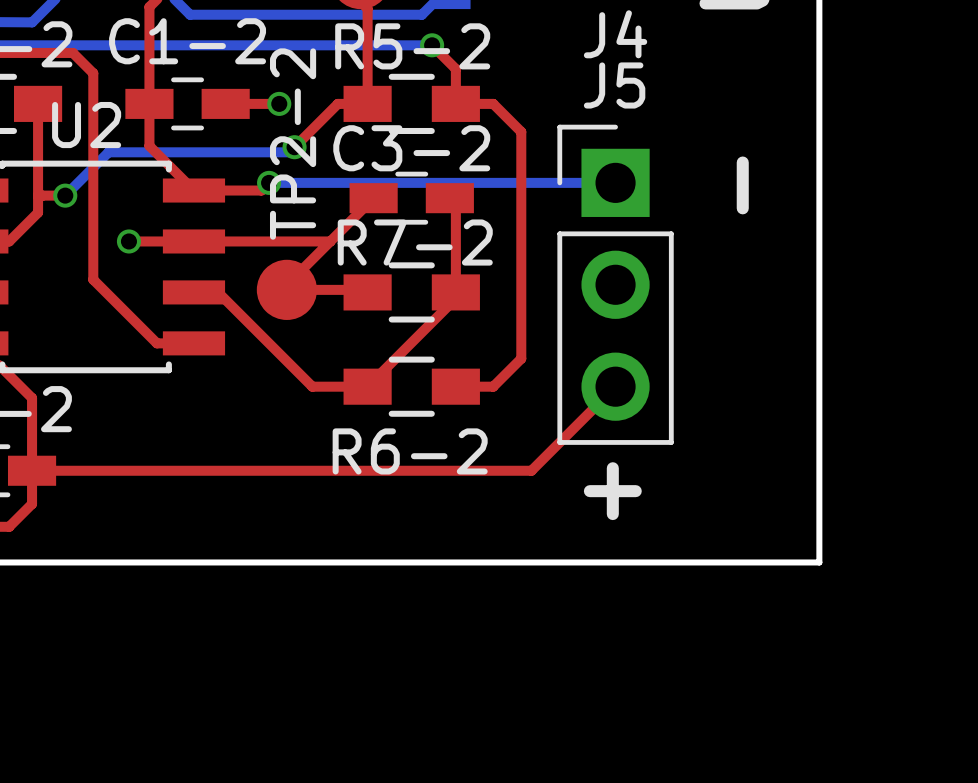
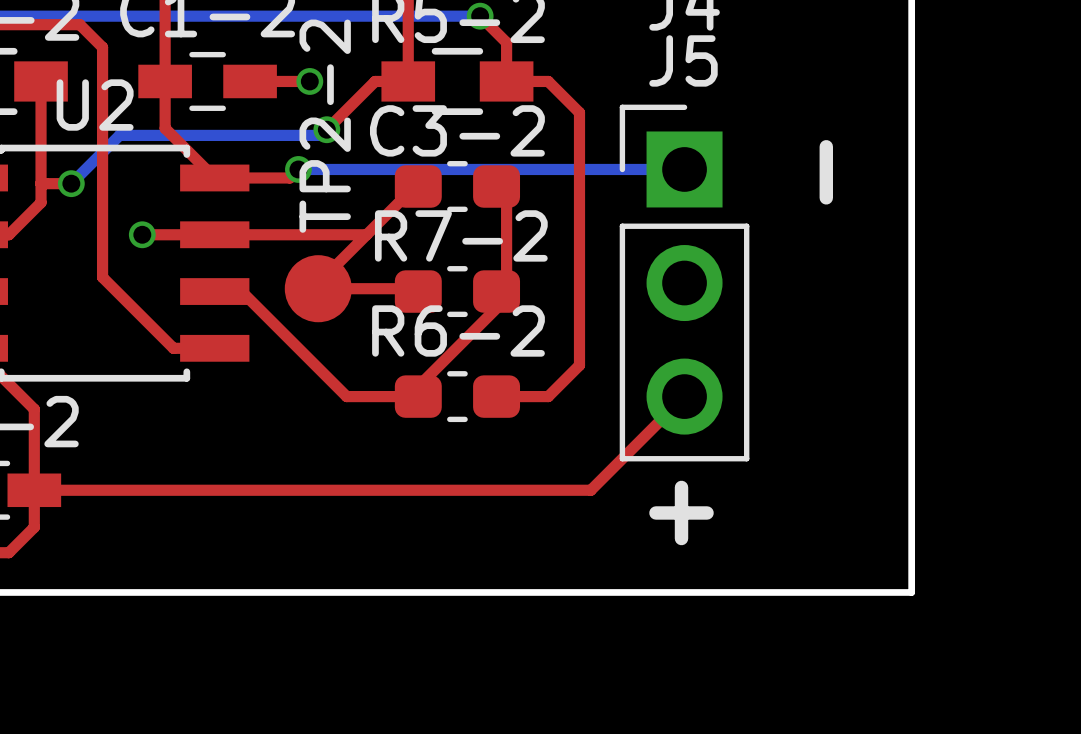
C3-2 footprint: [349, 171, 474, 225] -> [394, 161, 521, 212]
R7-2 footprint: [343, 262, 480, 323] -> [394, 266, 521, 318]
R6-2 footprint: [343, 356, 480, 417] -> [394, 371, 521, 423]
R6-2 name position: R6-2 (410, 451) -> R6-2 (458, 330)

